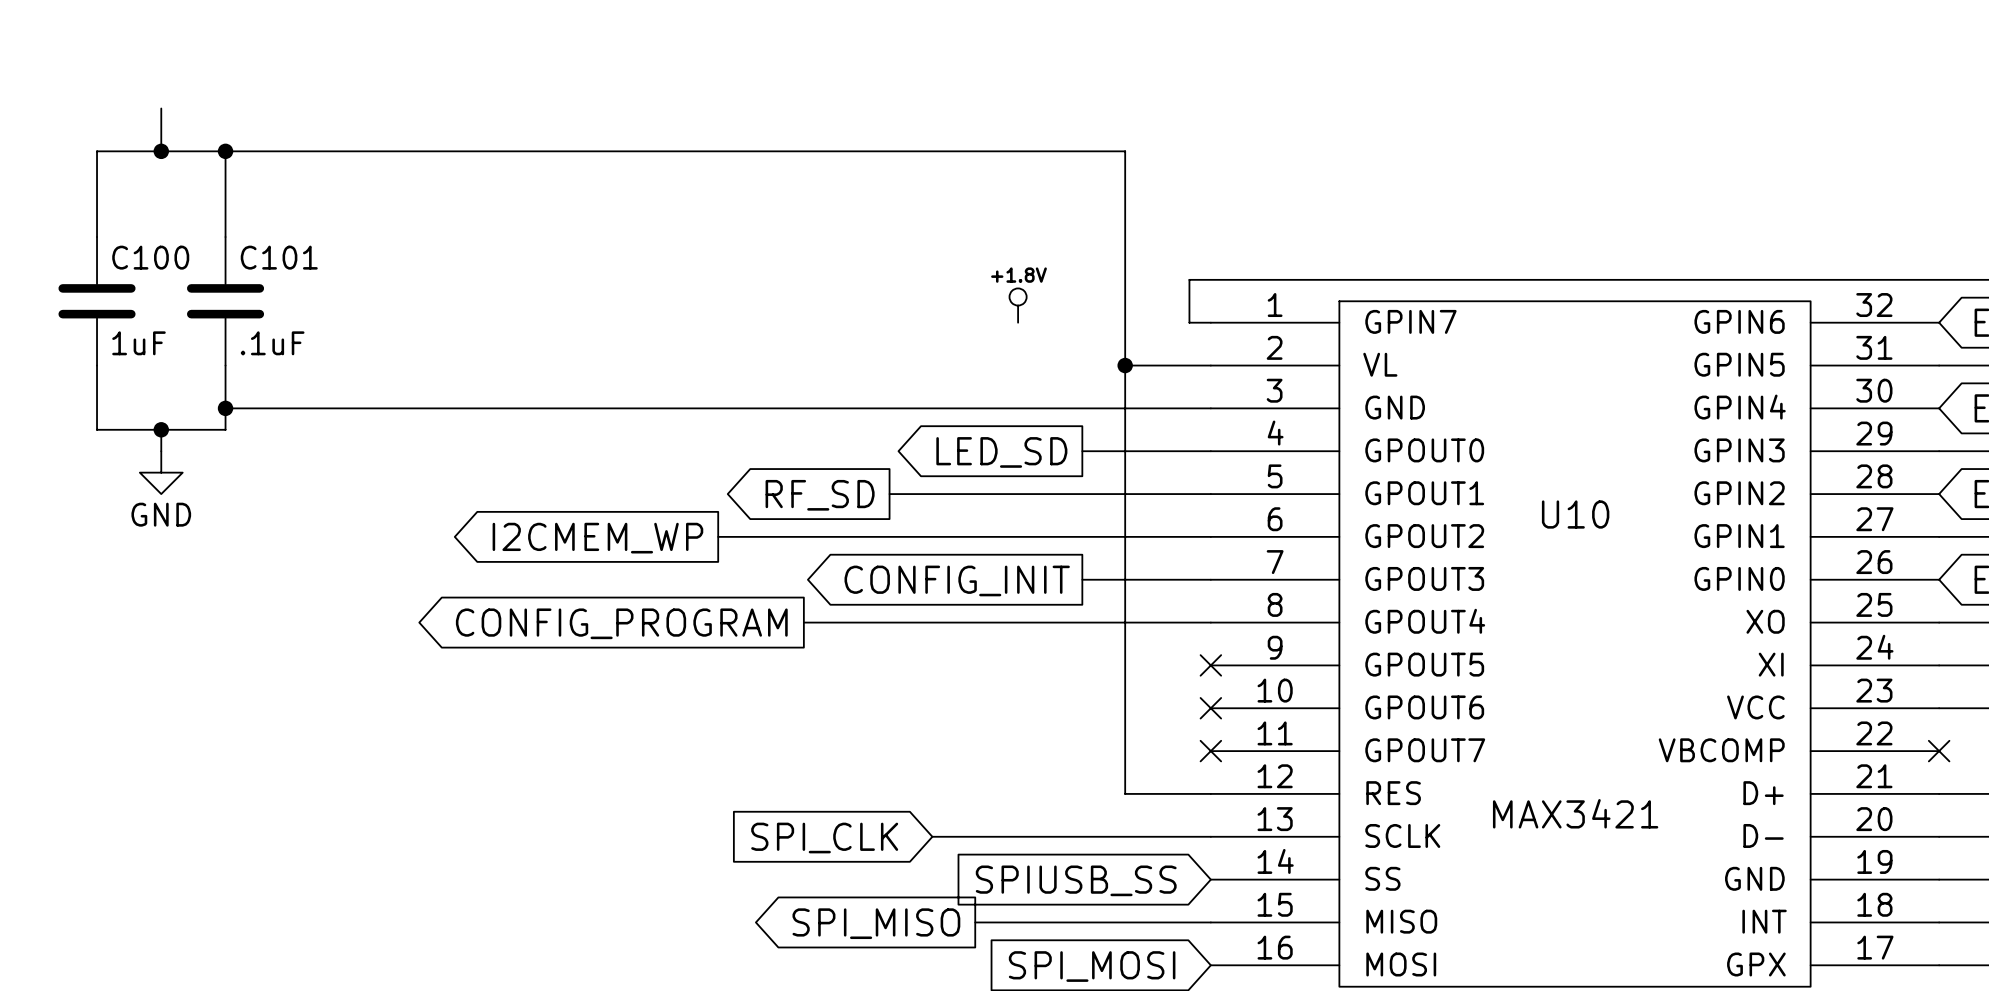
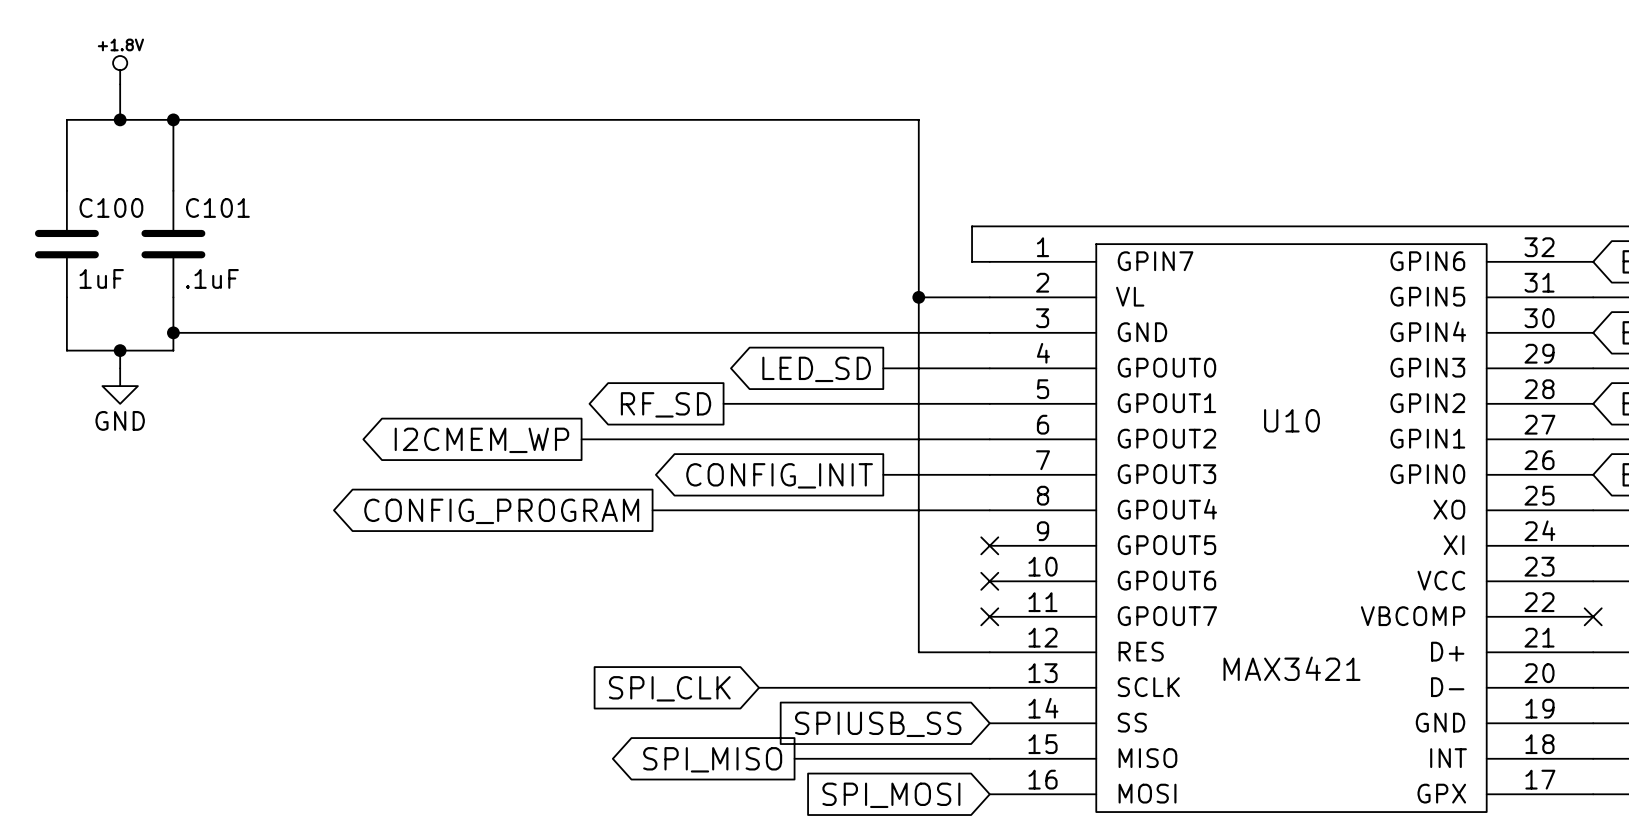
power symbol: none -> +1.8V (120, 70)
power symbol: +1.8V (1018, 305) -> none

